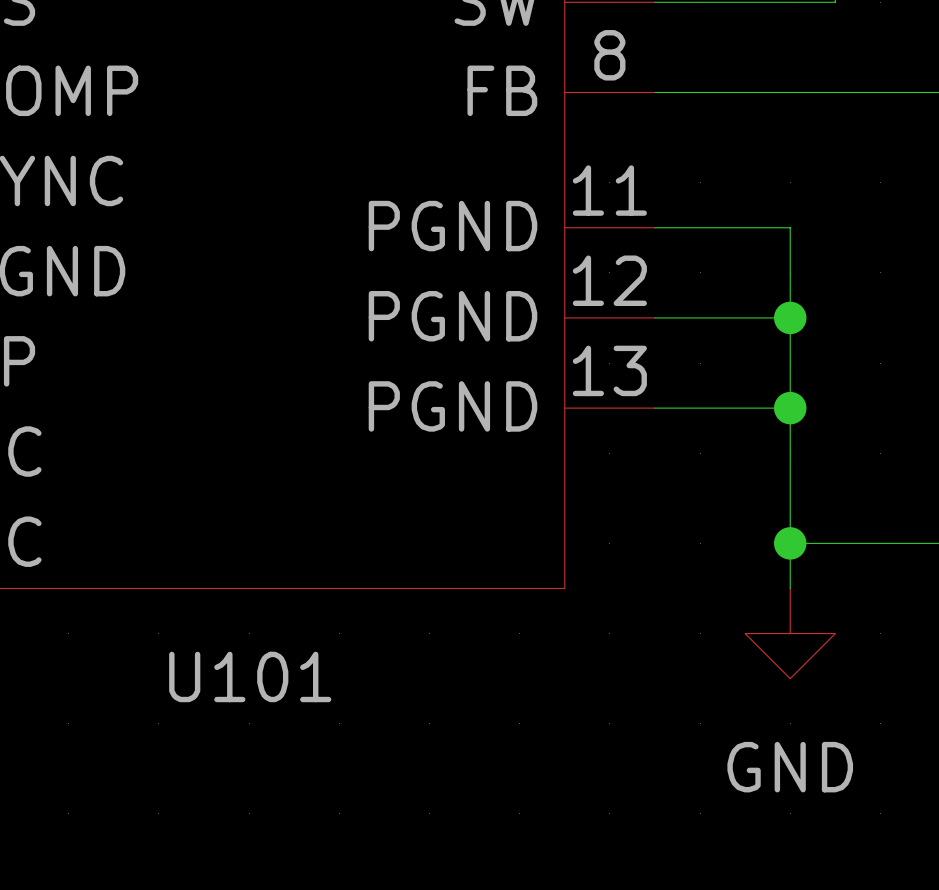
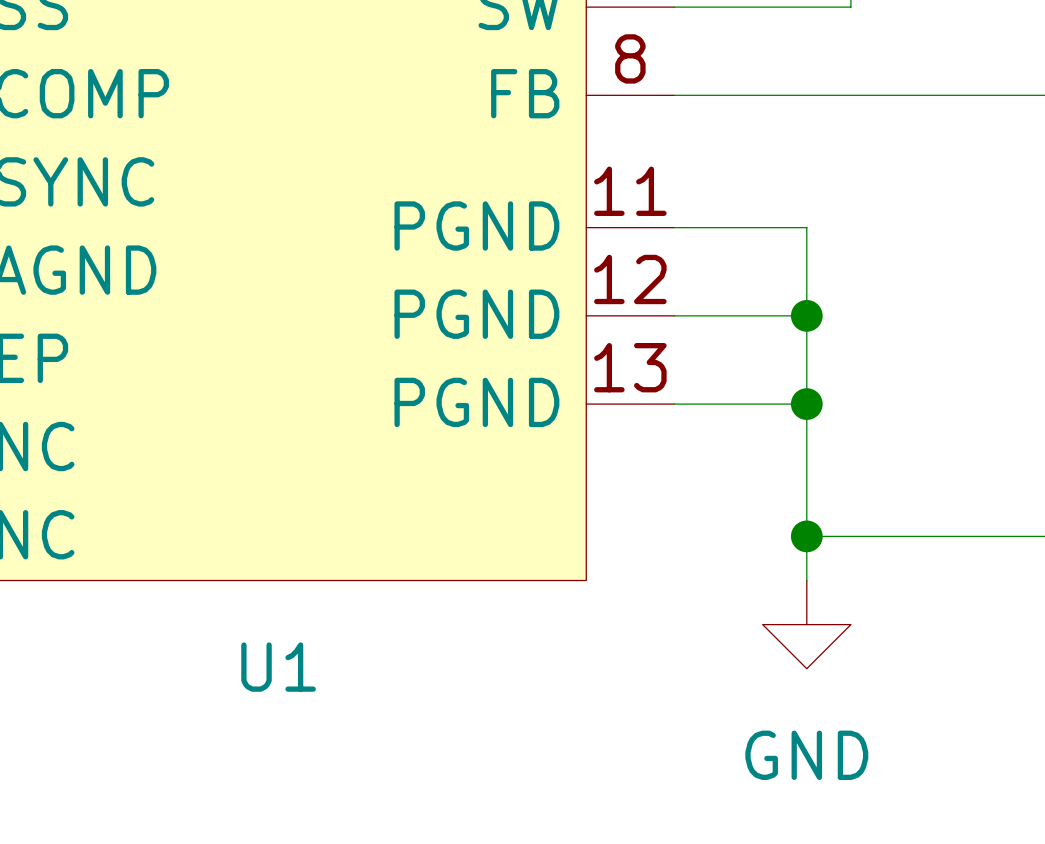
U101 name: U101 (250, 676) -> U1 (278, 667)

